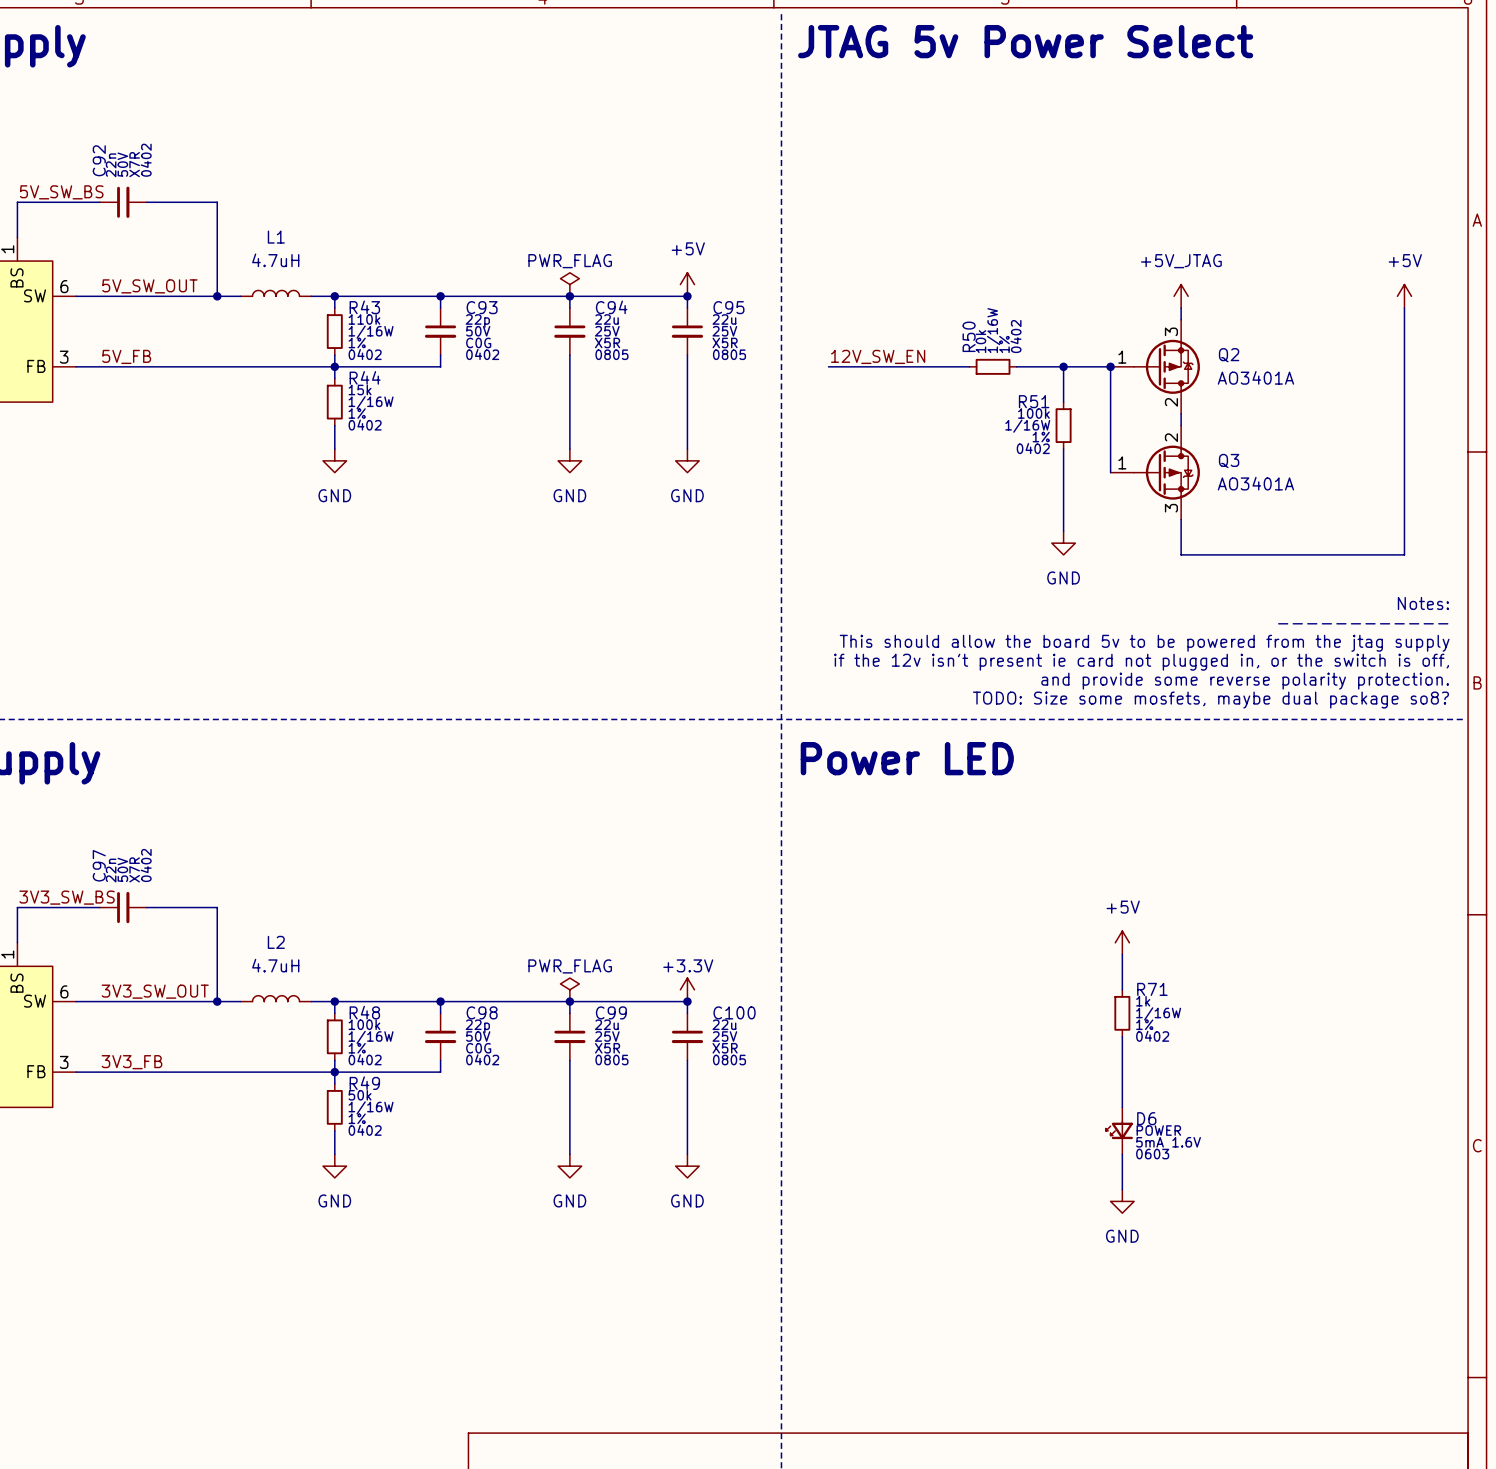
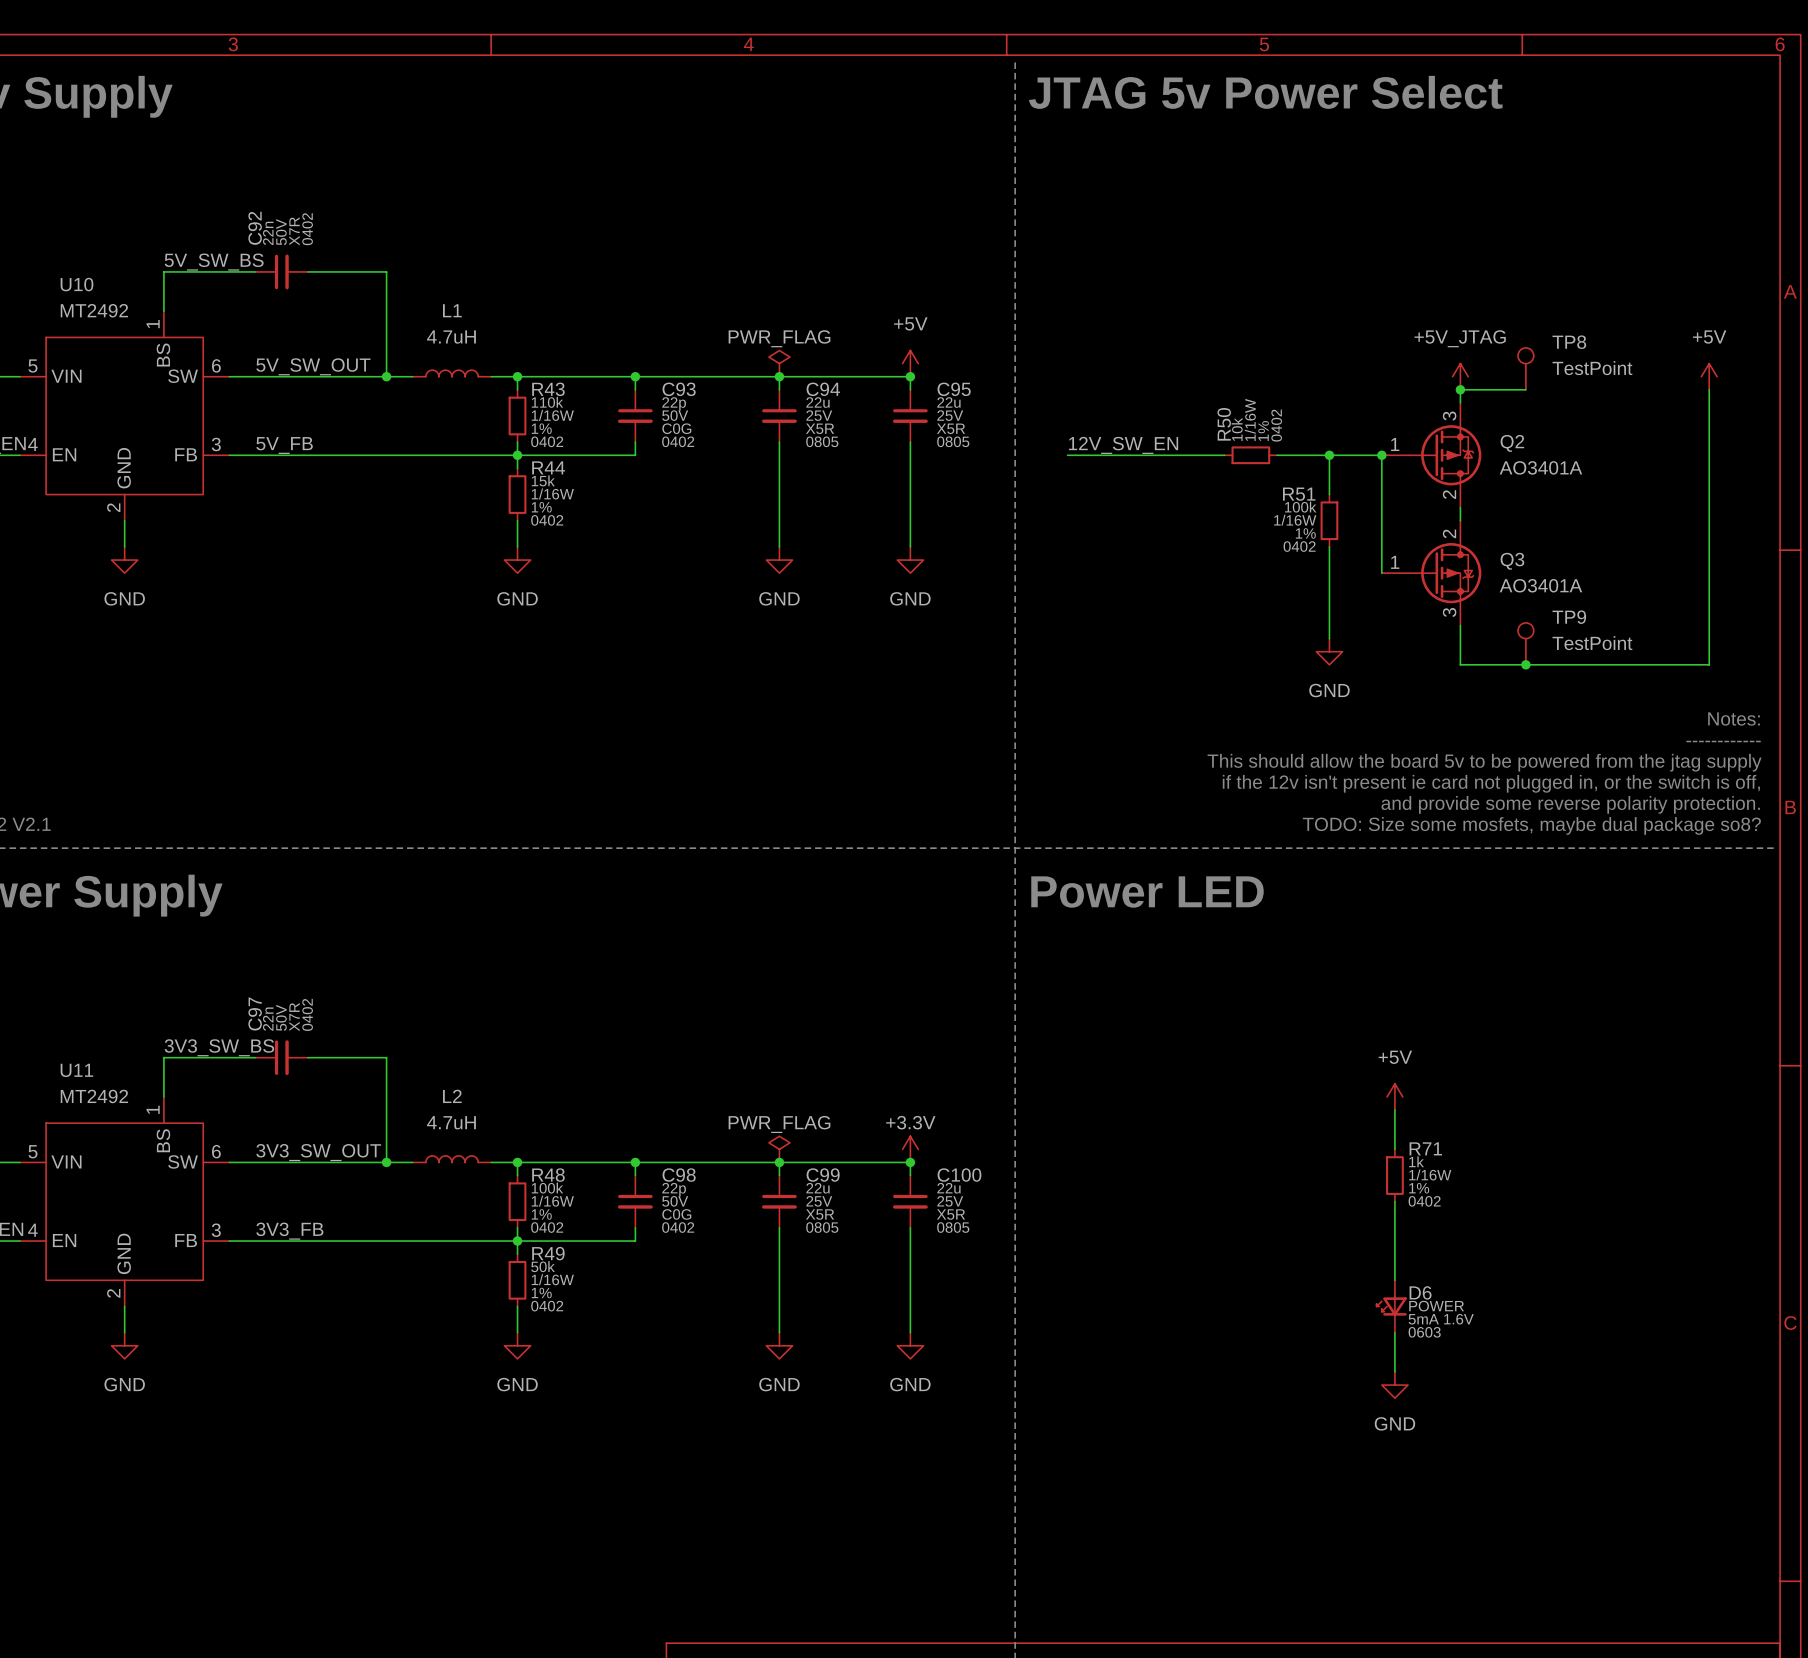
TP8: none -> TestPoint (1525, 368)
wire: none -> (1460, 389) (1525, 389)
junction: none -> (1460, 389)
TP9: none -> TestPoint (1525, 643)
junction: none -> (1525, 664)

